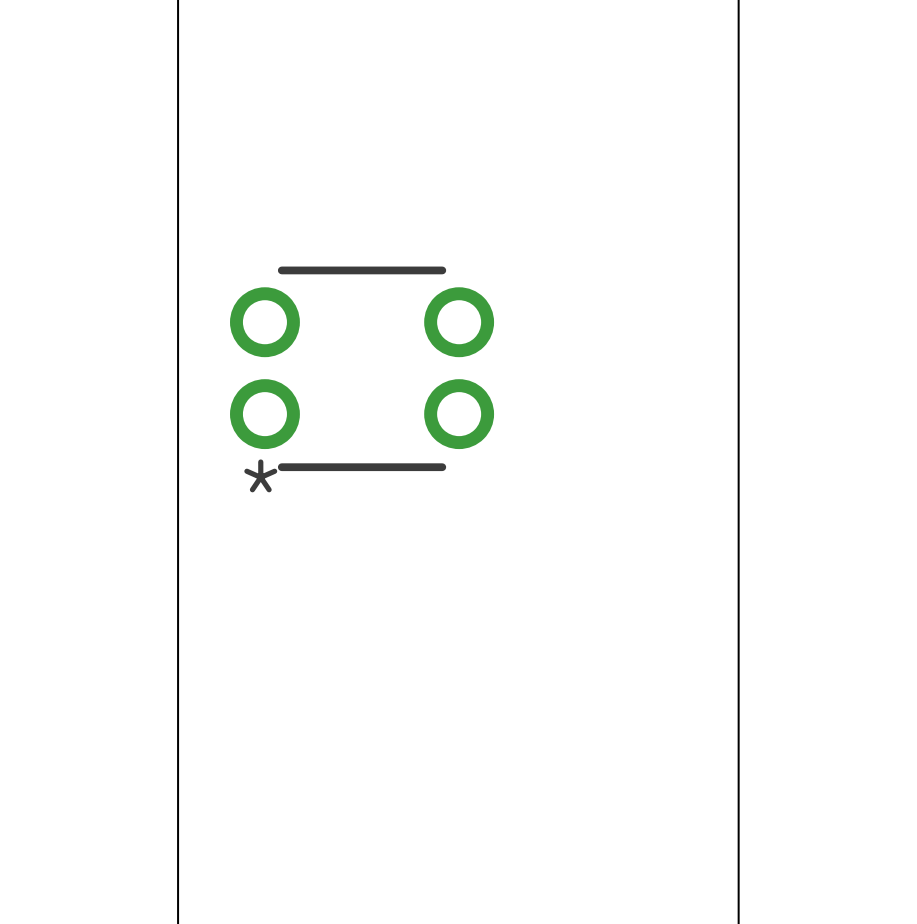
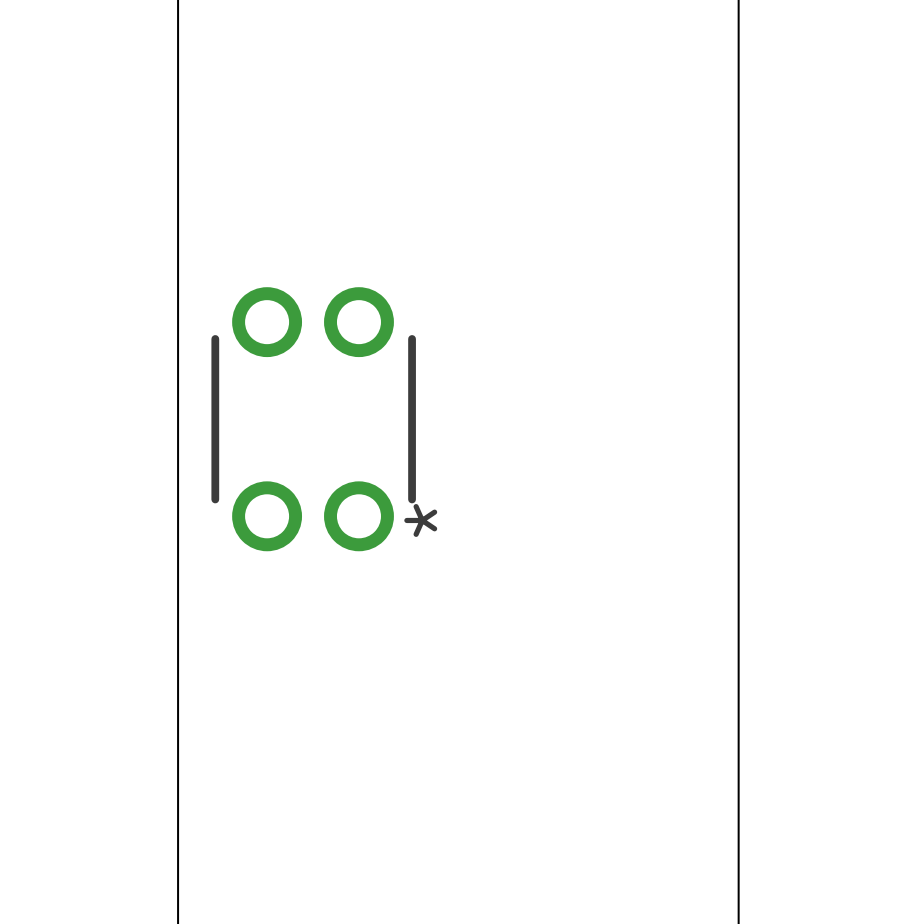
part rotation: 0° (362, 368) -> 90° counterclockwise (313, 419)

